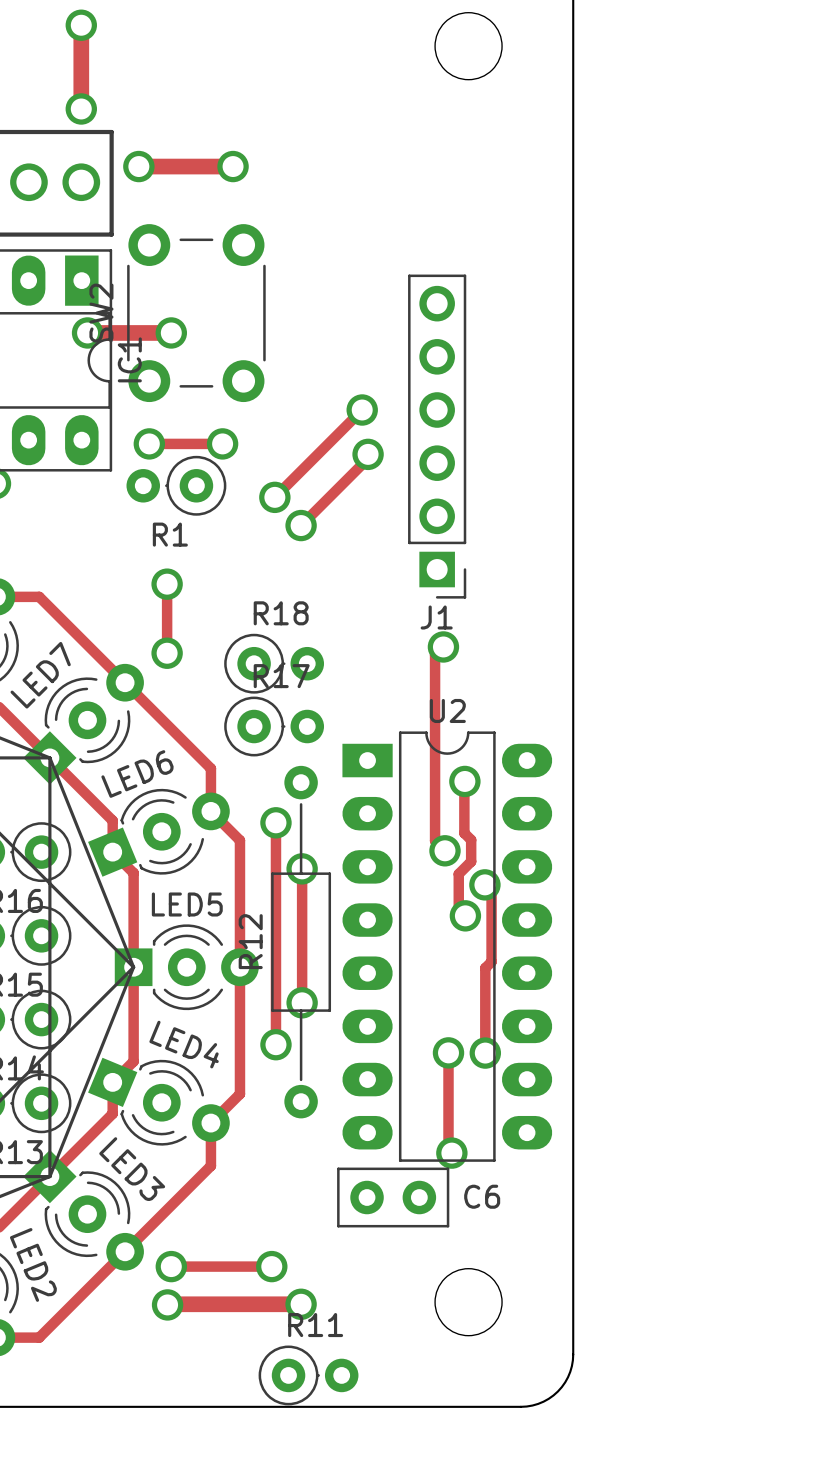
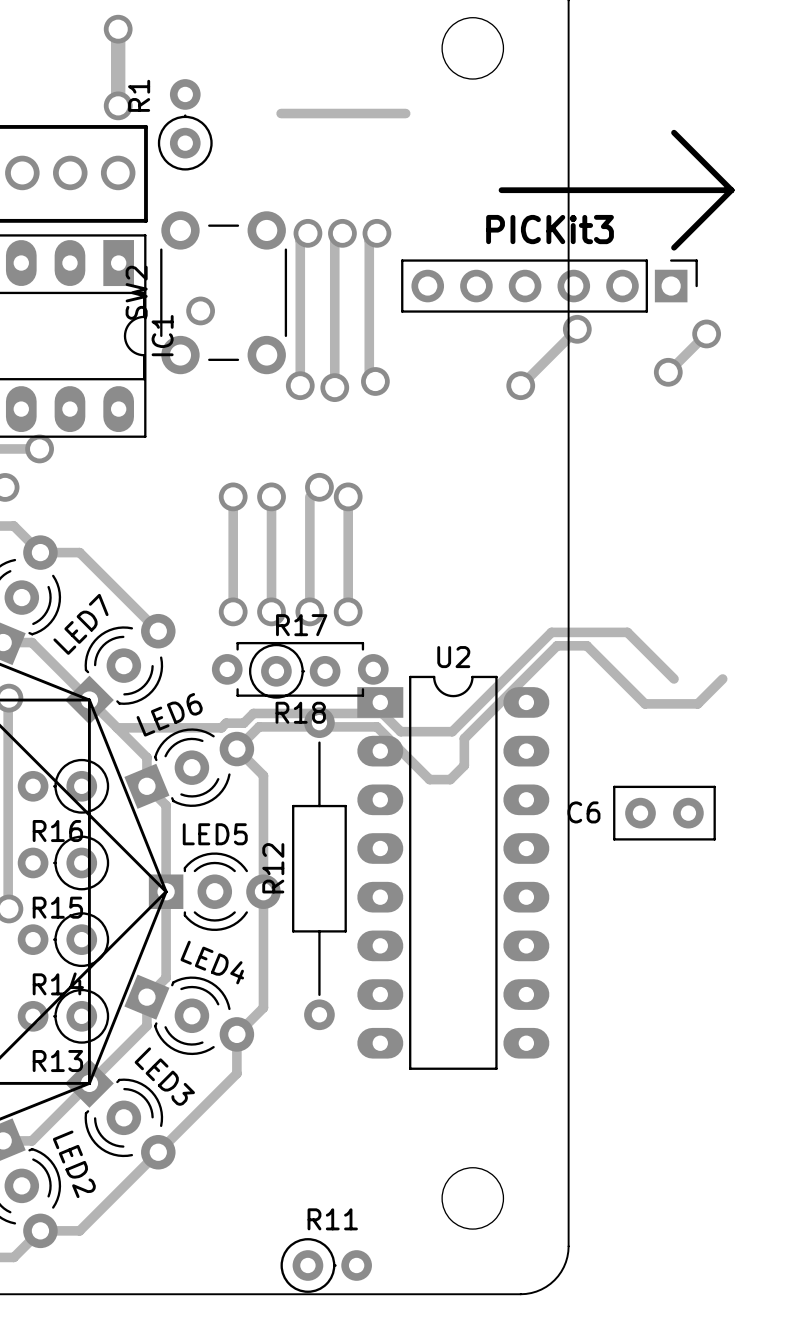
track: none -> (281, 113) (405, 113)
line: none -> (674, 132) (731, 190)
track: (138, 166) (233, 166) -> none
via: (138, 166) -> none
via: (233, 166) -> none
line: none -> (501, 190) (731, 190)
line: none -> (731, 190) (674, 247)
track: none -> (307, 233) (300, 241) (300, 385)
via: none -> (307, 233)
track: none -> (342, 233) (334, 241) (334, 387)
via: none -> (342, 233)
track: none -> (376, 233) (369, 241) (369, 387)
via: none -> (376, 233)
part: none -> PICKit3 (549, 286)
track: (87, 332) (171, 332) -> none
via: (87, 332) -> none
track: none -> (577, 329) (520, 385)
via: none -> (577, 329)
track: none -> (706, 333) (668, 372)
via: none -> (706, 333)
via: none -> (668, 372)
track: (362, 410) (274, 497) -> none
via: none -> (300, 385)
via: none -> (520, 385)
via: none -> (334, 387)
J1: (437, 436) -> none
track: (149, 443) (222, 443) -> none
via: (149, 443) -> none
via: (222, 443) -> none
track: (368, 454) (368, 458) (301, 525) -> none
via: (368, 454) -> none
R1 rotation: 0° (176, 485) -> 90° clockwise (185, 124)
R1 position: (176, 485) -> (185, 124)
via: (274, 497) -> none
track: none -> (233, 496) (233, 611)
via: none -> (233, 496)
track: none -> (271, 496) (271, 611)
via: none -> (271, 496)
track: none -> (309, 496) (309, 611)
track: none -> (348, 496) (348, 611)
via: none -> (348, 496)
track: (167, 584) (167, 653) -> none
via: (167, 584) -> none
R18 name position: R18 (281, 613) -> R18 (300, 712)
R18 footprint: [224, 633, 325, 694] -> [211, 641, 389, 697]
track: (443, 646) (435, 655) (435, 840) (445, 850) -> none
via: (443, 646) -> none
via position: (167, 653) -> (233, 611)
via: none -> (271, 611)
via: none -> (309, 611)
via: none -> (348, 611)
track: (125, 682) (210, 768) (210, 811) -> (722, 678) (697, 703) (645, 703) (586, 645) (557, 645) (464, 738) (464, 765) (450, 779) (429, 779) (376, 726) (259, 726) (236, 749)
track: none -> (674, 678) (627, 632) (551, 632) (452, 731) (400, 731) (382, 713) (253, 713) (243, 723) (226, 723) (221, 727) (117, 727)
track: (464, 781) (464, 833) (471, 839) (471, 861) (458, 874) (458, 909) (465, 915) -> none
via: (464, 781) -> none
track: (275, 822) (275, 1044) -> none
via: (275, 822) -> none
via: (445, 850) -> none
track: (302, 868) (302, 1002) -> none
via: (302, 868) -> none
track: (484, 884) (491, 891) (491, 961) (485, 968) (485, 1053) -> none
via: (484, 884) -> none
via: (465, 915) -> none
via: (302, 1002) -> none
via: (275, 1044) -> none
track: (448, 1052) (448, 1149) (451, 1153) -> none
via: (448, 1052) -> none
via: (485, 1053) -> none
via: (451, 1153) -> none
C6 name position: C6 (482, 1196) -> C6 (583, 812)
C6 position: (393, 1197) -> (664, 813)
track: (171, 1266) (271, 1266) -> none
via: (171, 1266) -> none
via: (271, 1266) -> none
via: (167, 1304) -> none
track: (301, 1304) (167, 1304) -> none
via: (301, 1304) -> none

